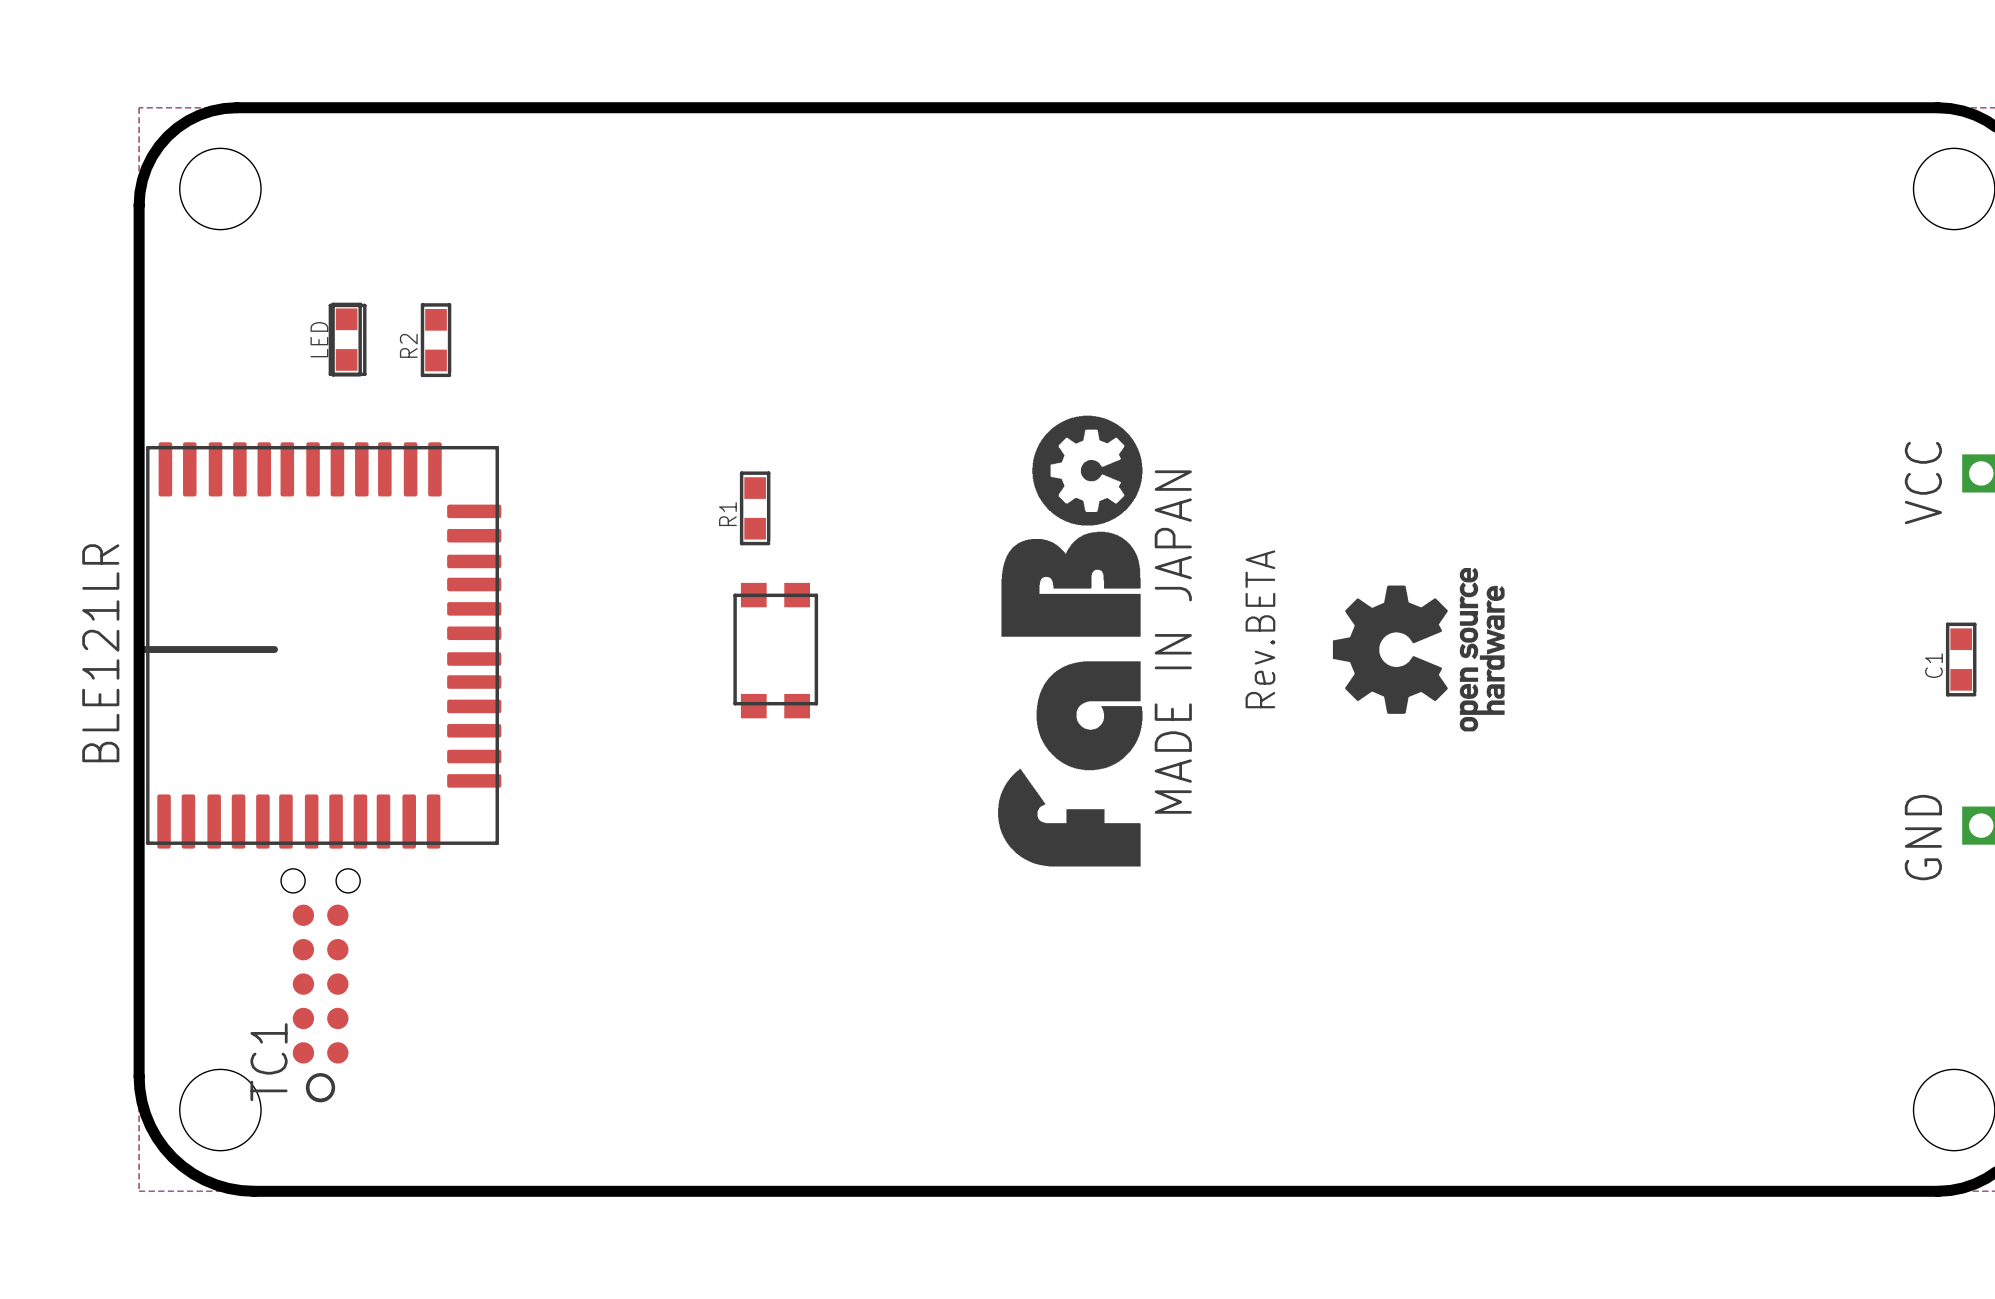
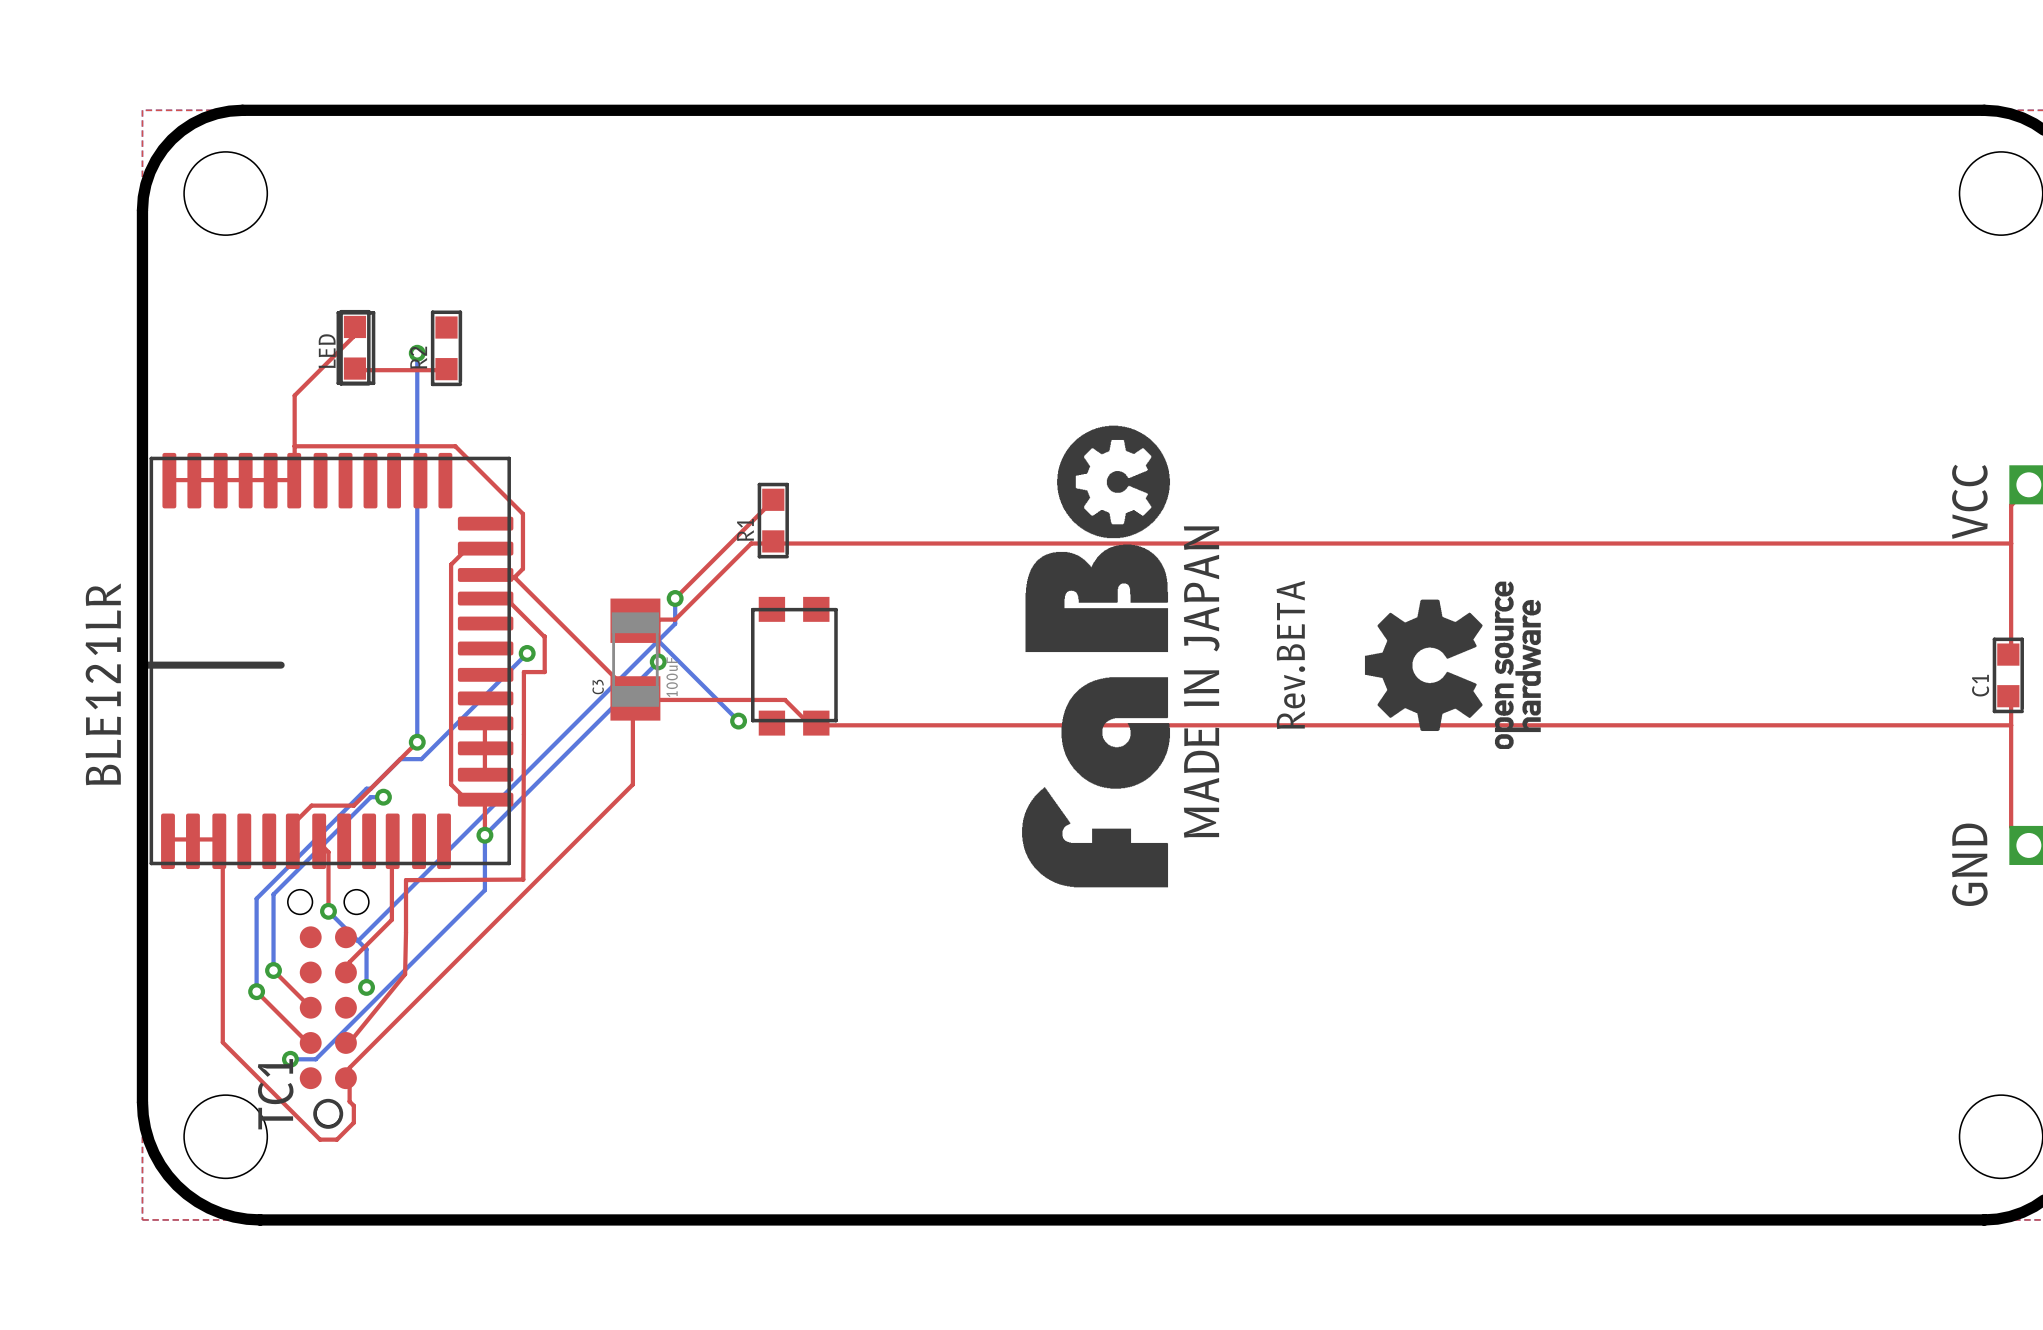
top track: none -> (354, 326) (353, 336) (294, 395) (294, 480) (169, 480)
bottom track: none -> (417, 353) (417, 742)
via: none -> (417, 353)
top track: none -> (354, 368) (358, 370) (446, 369)
top track: none -> (294, 446) (455, 446) (522, 513) (522, 568) (514, 577)
top track: none -> (2028, 484) (2028, 488) (2011, 505) (2011, 653) (2008, 654)
top track: none -> (773, 499) (675, 598)
top track: none -> (2011, 543) (776, 543) (773, 541) (772, 543) (751, 543) (675, 619) (637, 619) (635, 620) (658, 619) (658, 661)
top track: none -> (485, 548) (484, 551) (463, 551) (451, 564) (451, 784) (463, 797) (484, 797) (484, 835)
top track: none -> (514, 577) (635, 698)
top track: none -> (485, 598) (489, 602) (510, 602) (544, 636) (544, 672) (523, 672) (523, 879) (406, 880) (405, 974) (349, 1042) (345, 1042)
bottom track: none -> (675, 598) (675, 623) (358, 940)
via: none -> (675, 598)
bottom track: none -> (658, 640) (738, 721)
bottom track: none -> (527, 653) (421, 759) (400, 759) (370, 788) (366, 788) (256, 898) (256, 991)
via: none -> (527, 653)
C3: none -> 100uF (635, 659)
bottom track: none -> (658, 661) (484, 835) (484, 890) (315, 1059) (290, 1059)
via: none -> (658, 661)
top track: none -> (2008, 696) (2011, 699) (2011, 826) (2028, 845)
top track: none -> (635, 698) (637, 699) (785, 699) (806, 721) (814, 721) (818, 725) (2011, 725)
top track: none -> (635, 698) (632, 699) (632, 784) (349, 1067) (349, 1076) (345, 1078) (349, 1080) (349, 1101) (353, 1105) (353, 1122) (336, 1139) (320, 1139) (222, 1042) (222, 843) (218, 839) (193, 839) (192, 841) (172, 839) (167, 841)
via: none -> (738, 721)
top track: none -> (485, 723) (485, 774)
top track: none -> (417, 742) (353, 805) (311, 805) (294, 822) (294, 839) (292, 841)
via: none -> (417, 742)
bottom track: none -> (383, 797) (370, 797) (273, 894) (273, 970)
via: none -> (383, 797)
via: none -> (484, 835)
top track: none -> (319, 841) (328, 852) (328, 911)
top track: none -> (392, 841) (391, 919) (349, 962) (349, 970) (345, 972)
bottom track: none -> (328, 911) (366, 949) (366, 987)
via: none -> (328, 911)
top track: none -> (273, 970) (310, 1007)
via: none -> (273, 970)
via: none -> (366, 987)
top track: none -> (256, 991) (307, 1042) (310, 1042)
via: none -> (256, 991)
via: none -> (290, 1059)

